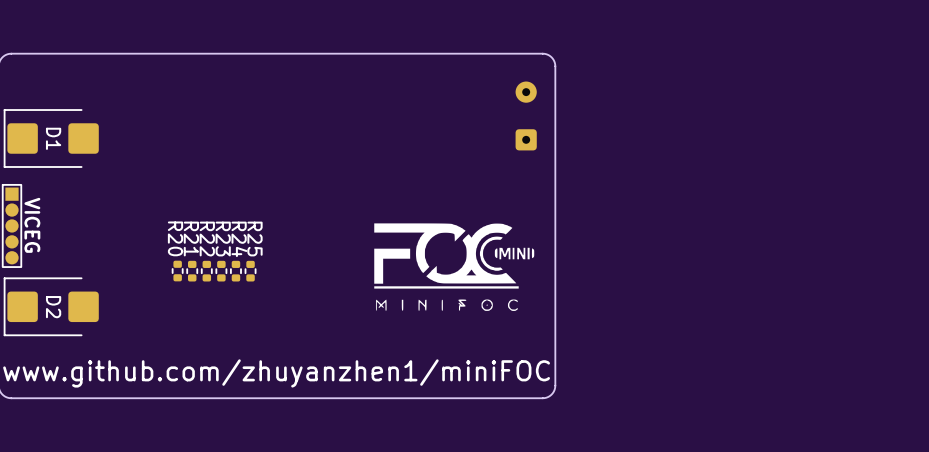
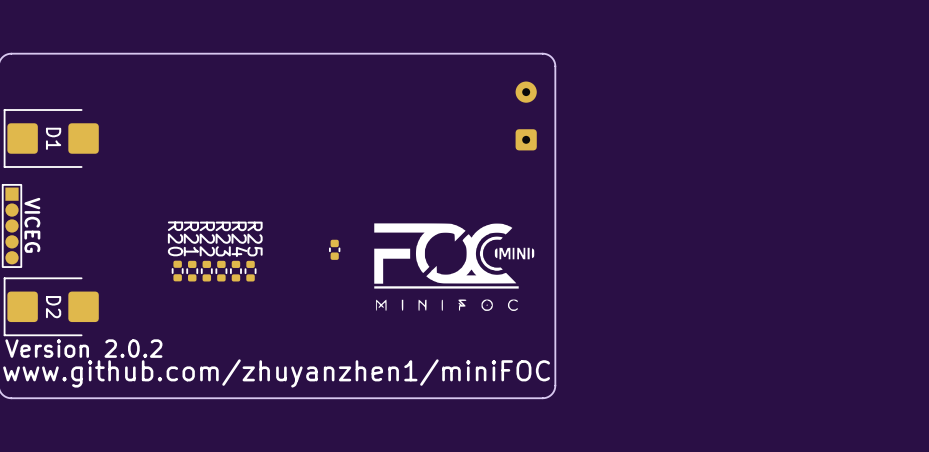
part: none -> (334, 249)
text: none -> Version 2.0.2 (83, 348)

